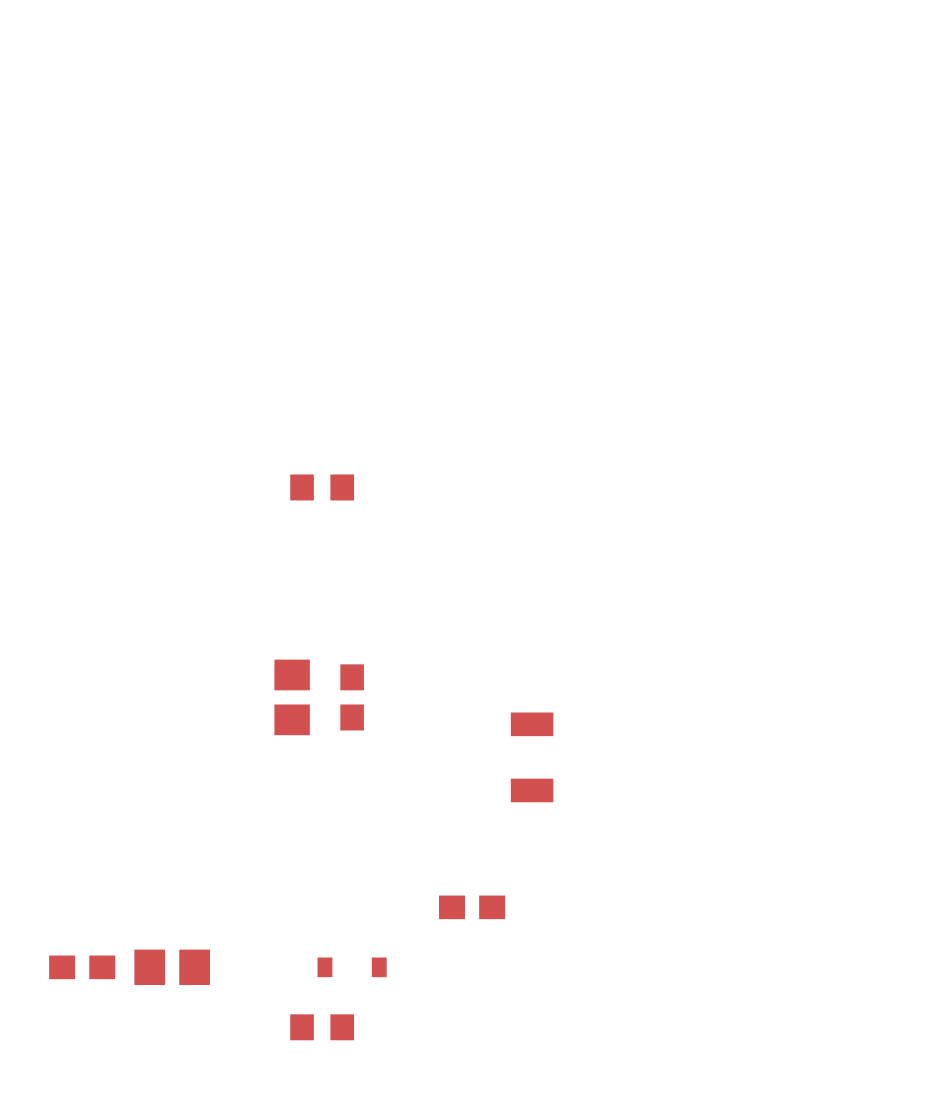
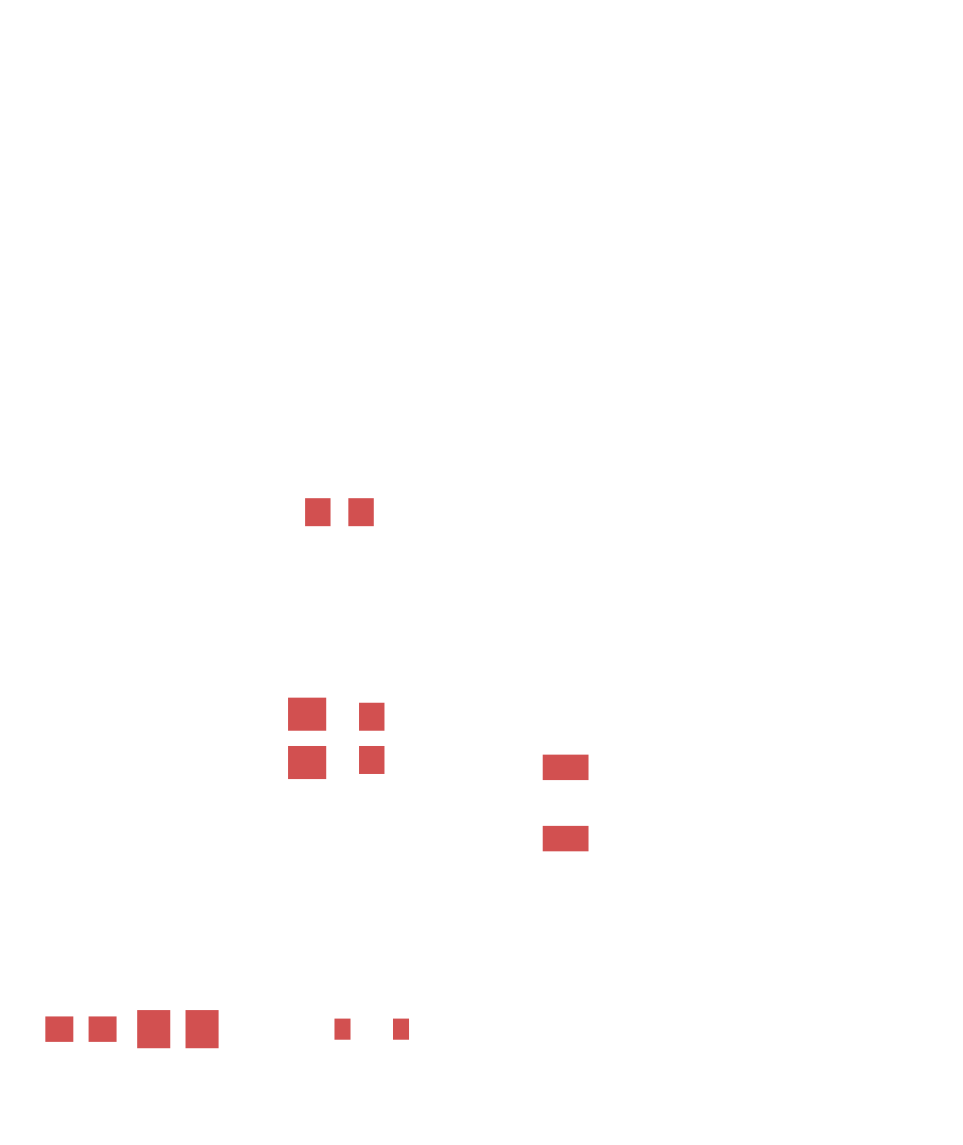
part: (472, 907) -> none
part: (322, 1027) -> none

